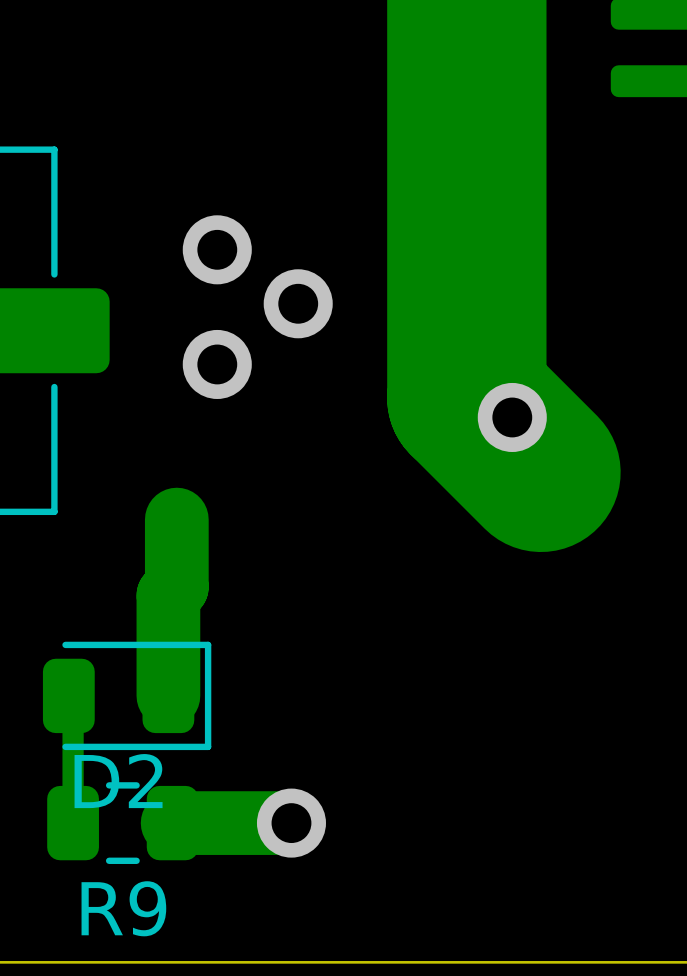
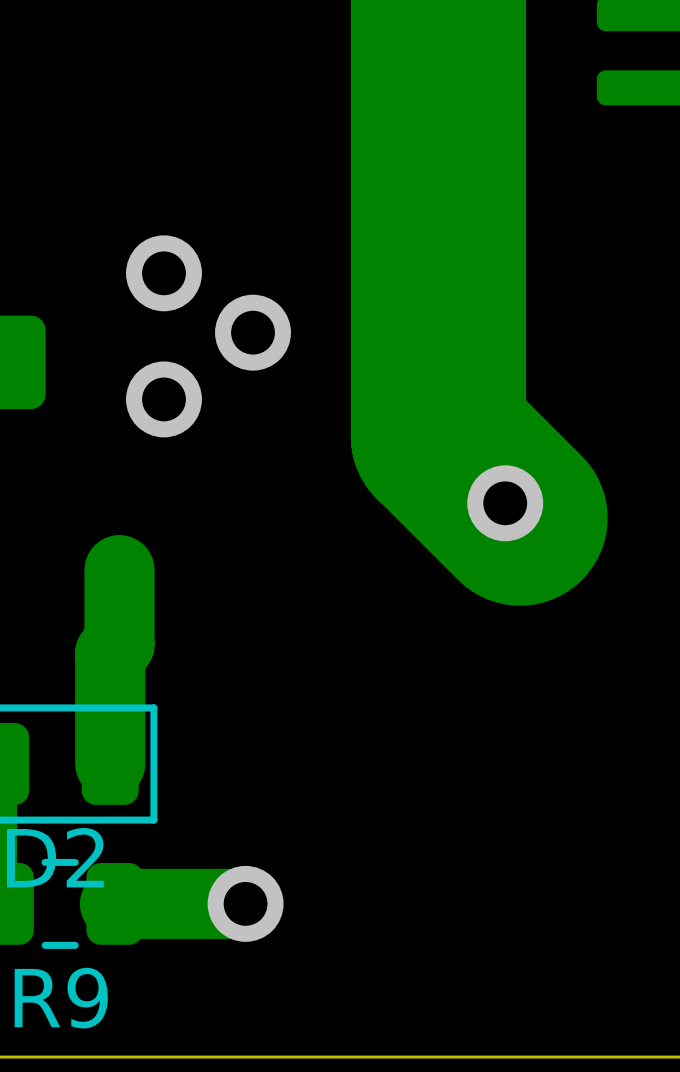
via position: (512, 417) -> (505, 503)

